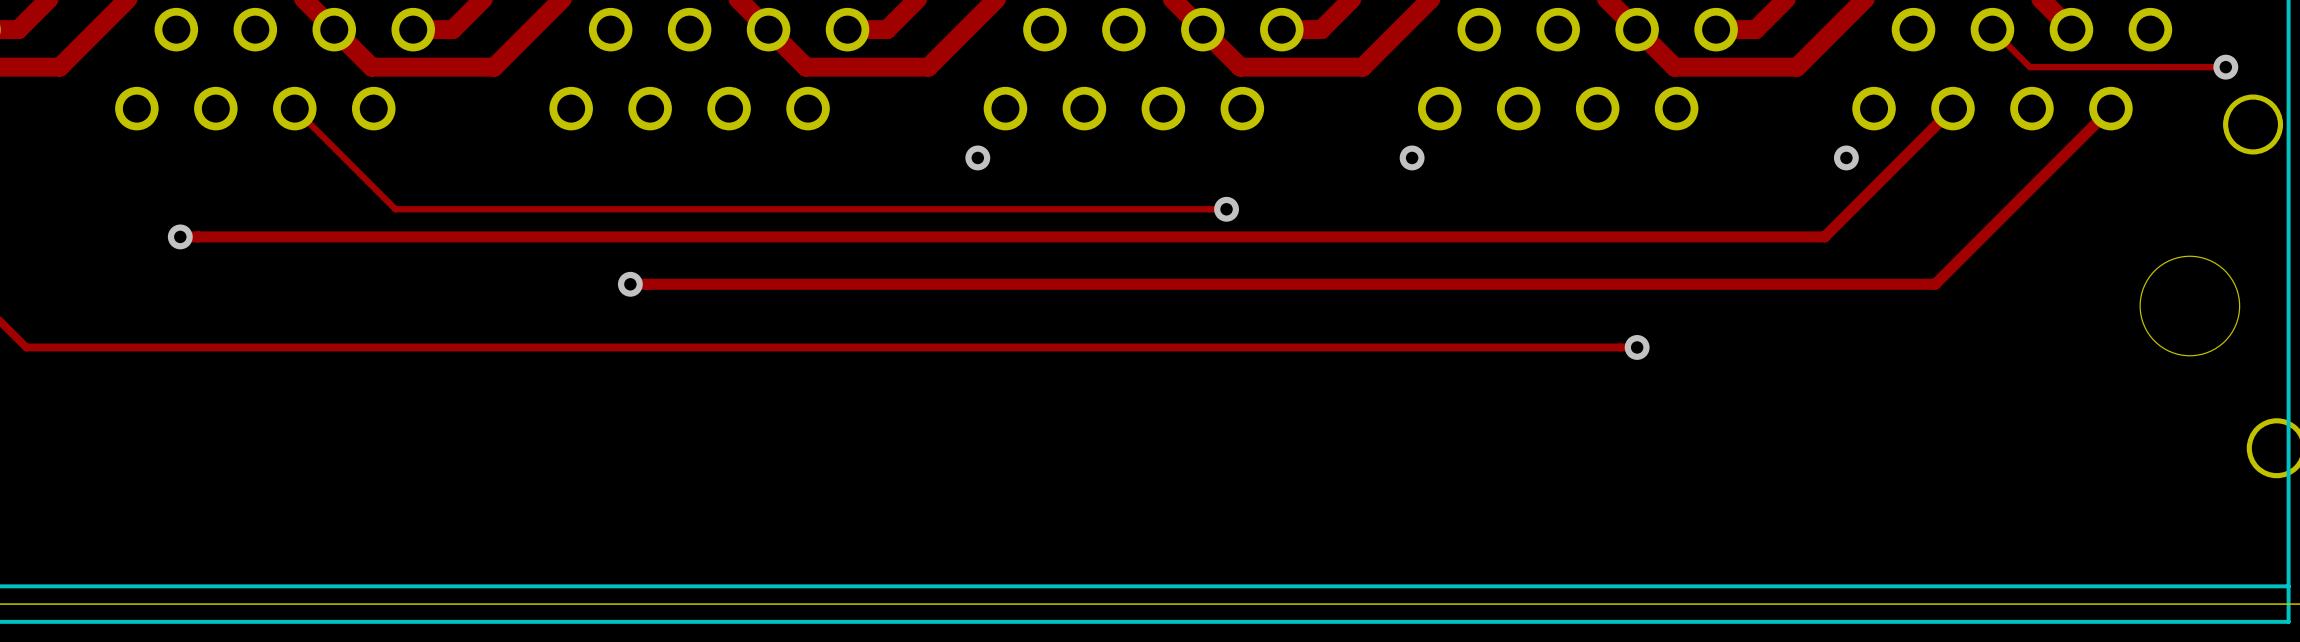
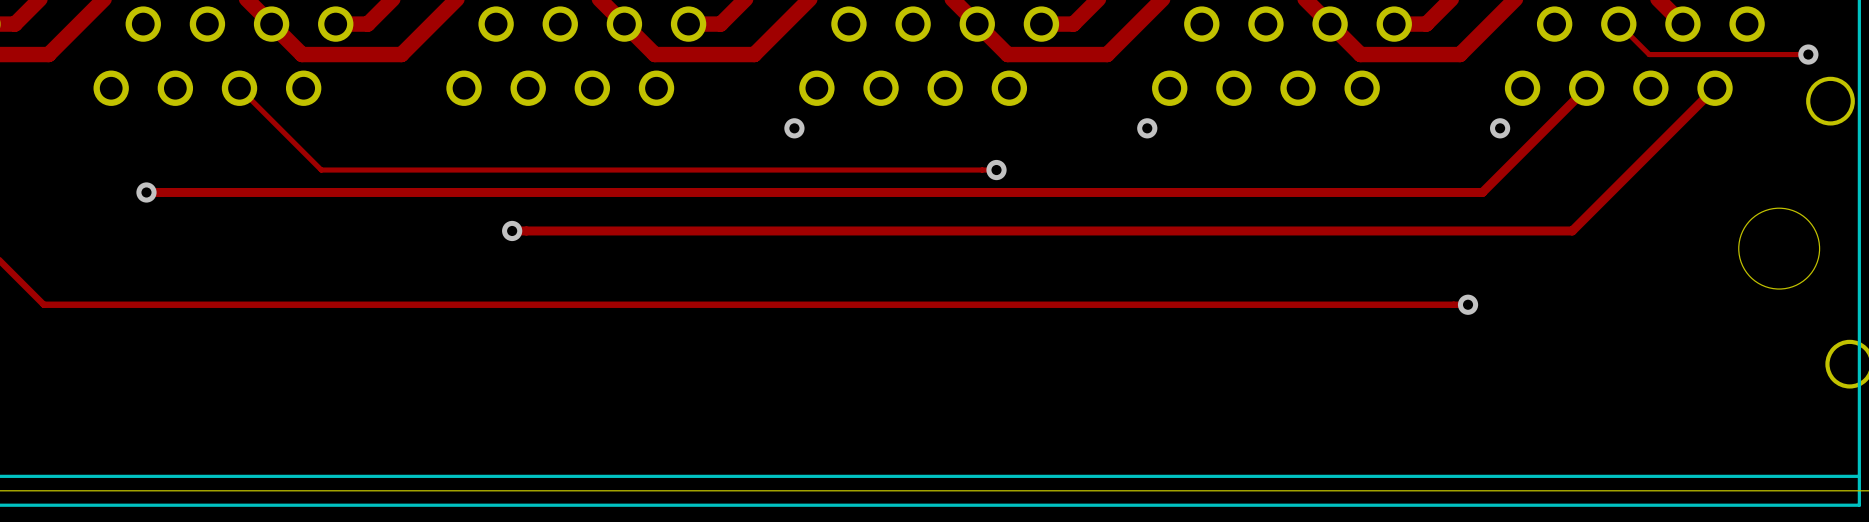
track: (26, 347) (1637, 347) -> (21, 282) (43, 304) (1468, 304)
via position: (1637, 347) -> (1468, 304)

